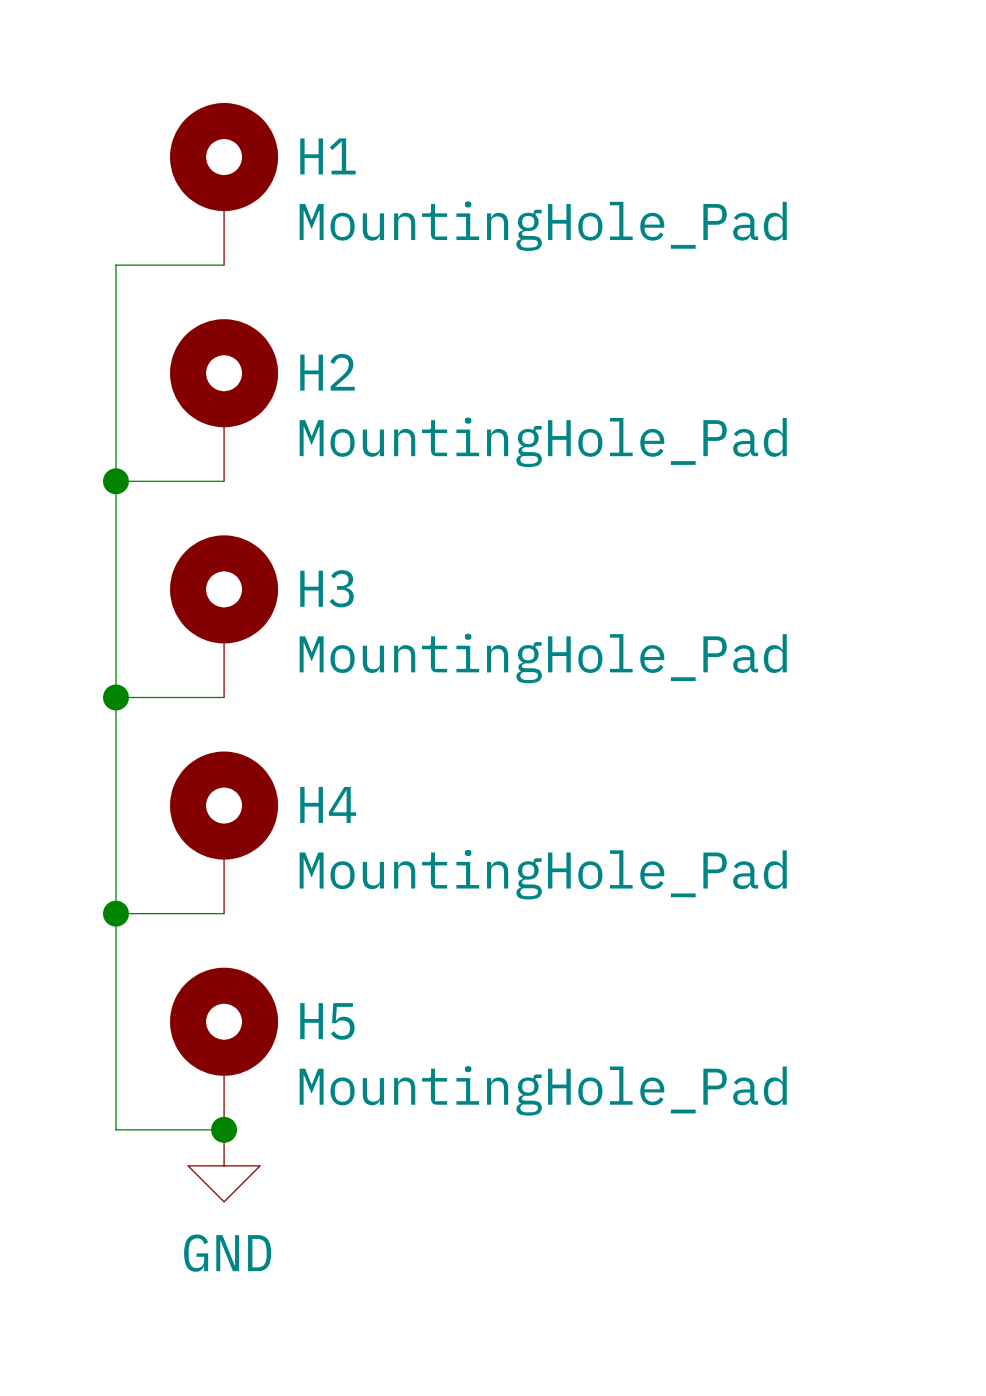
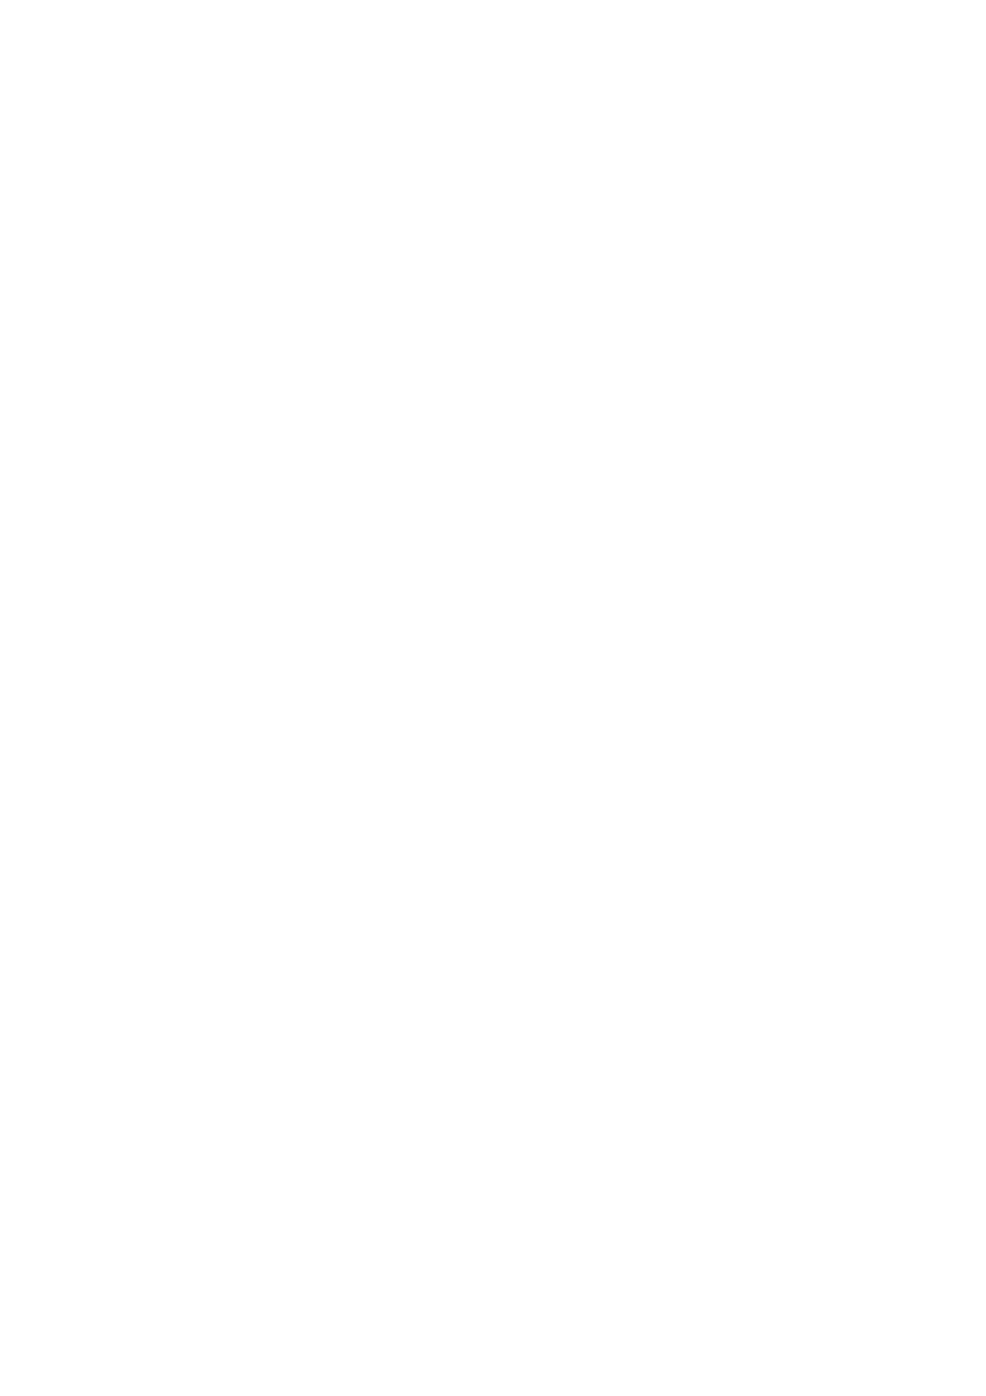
H1: MountingHole_Pad (224, 184) -> none
wire: (224, 265) (115, 265) (115, 1129) (224, 1129) -> none
H2: MountingHole_Pad (224, 400) -> none
wire: (115, 481) (224, 481) -> none
junction: (115, 481) -> none
H3: MountingHole_Pad (224, 616) -> none
wire: (115, 697) (224, 697) -> none
junction: (115, 697) -> none
H4: MountingHole_Pad (224, 832) -> none
wire: (115, 913) (224, 913) -> none
junction: (115, 913) -> none
H5: MountingHole_Pad (224, 1048) -> none
junction: (224, 1129) -> none
power symbol: GND (224, 1165) -> none

